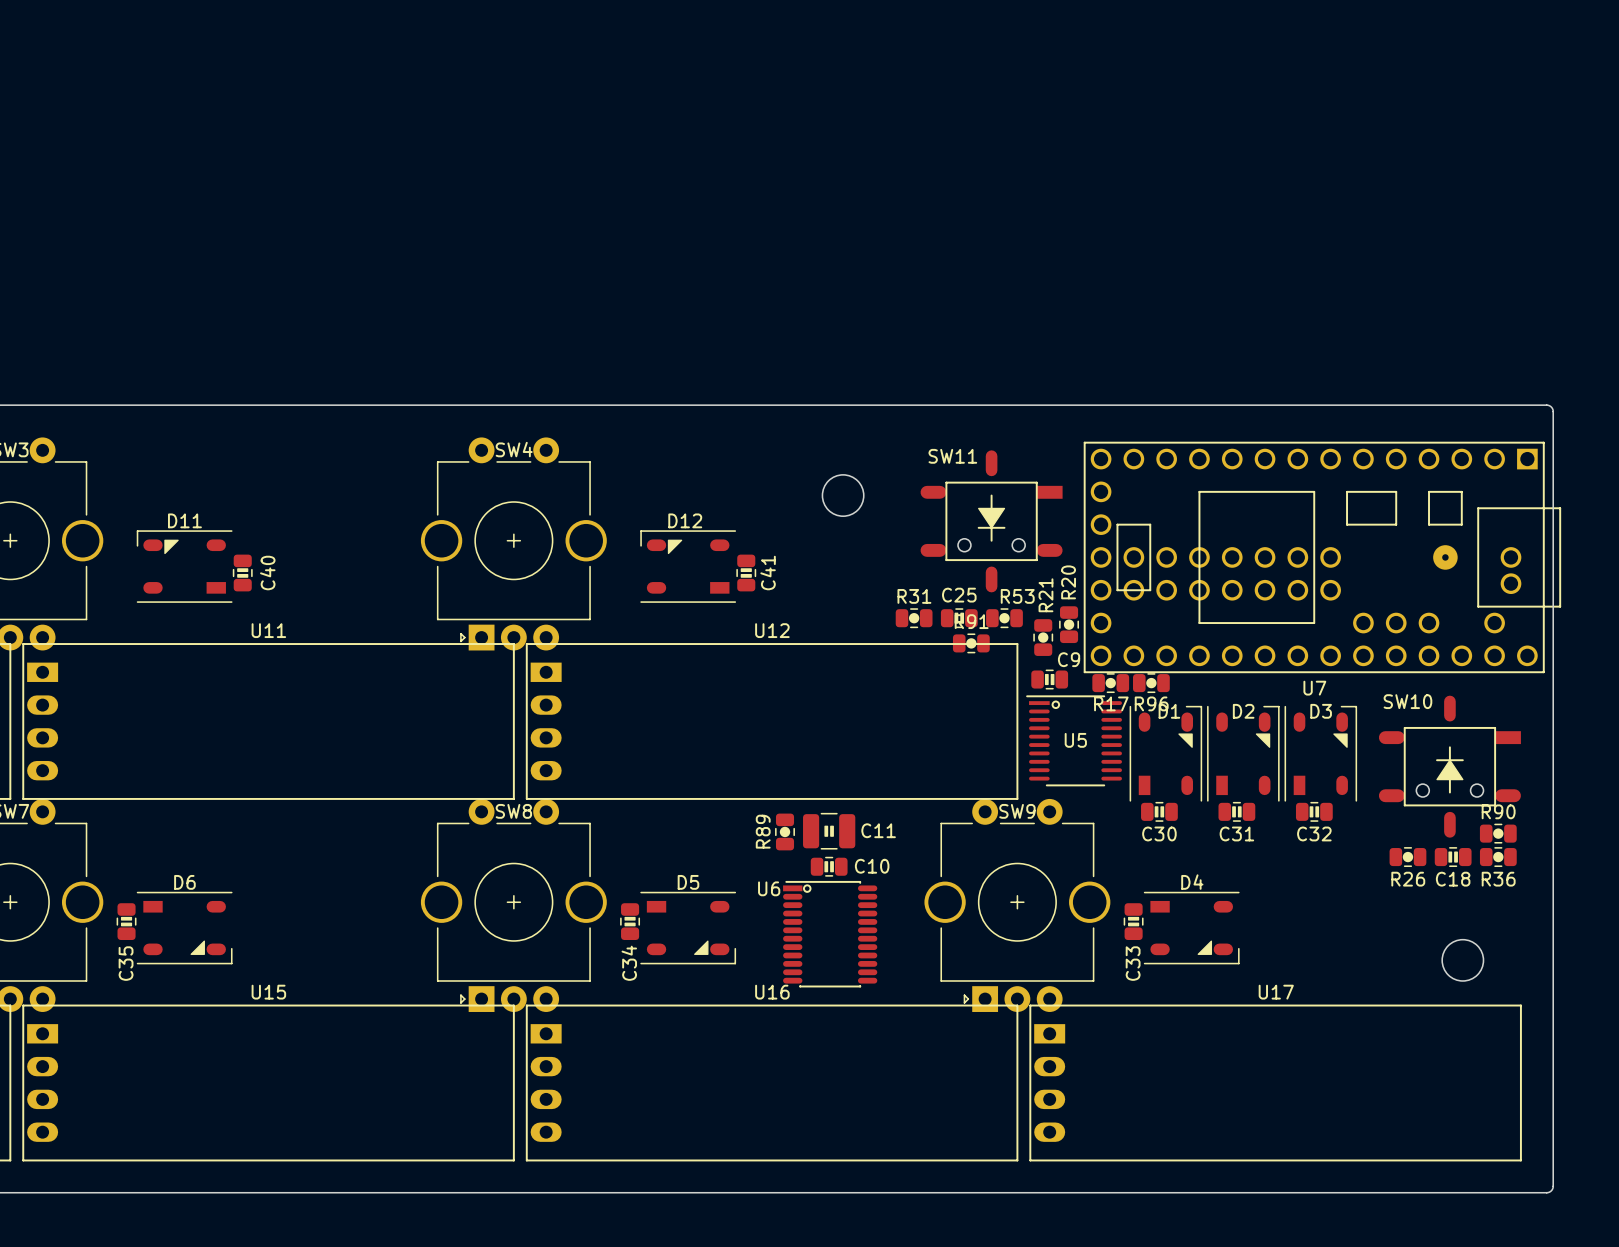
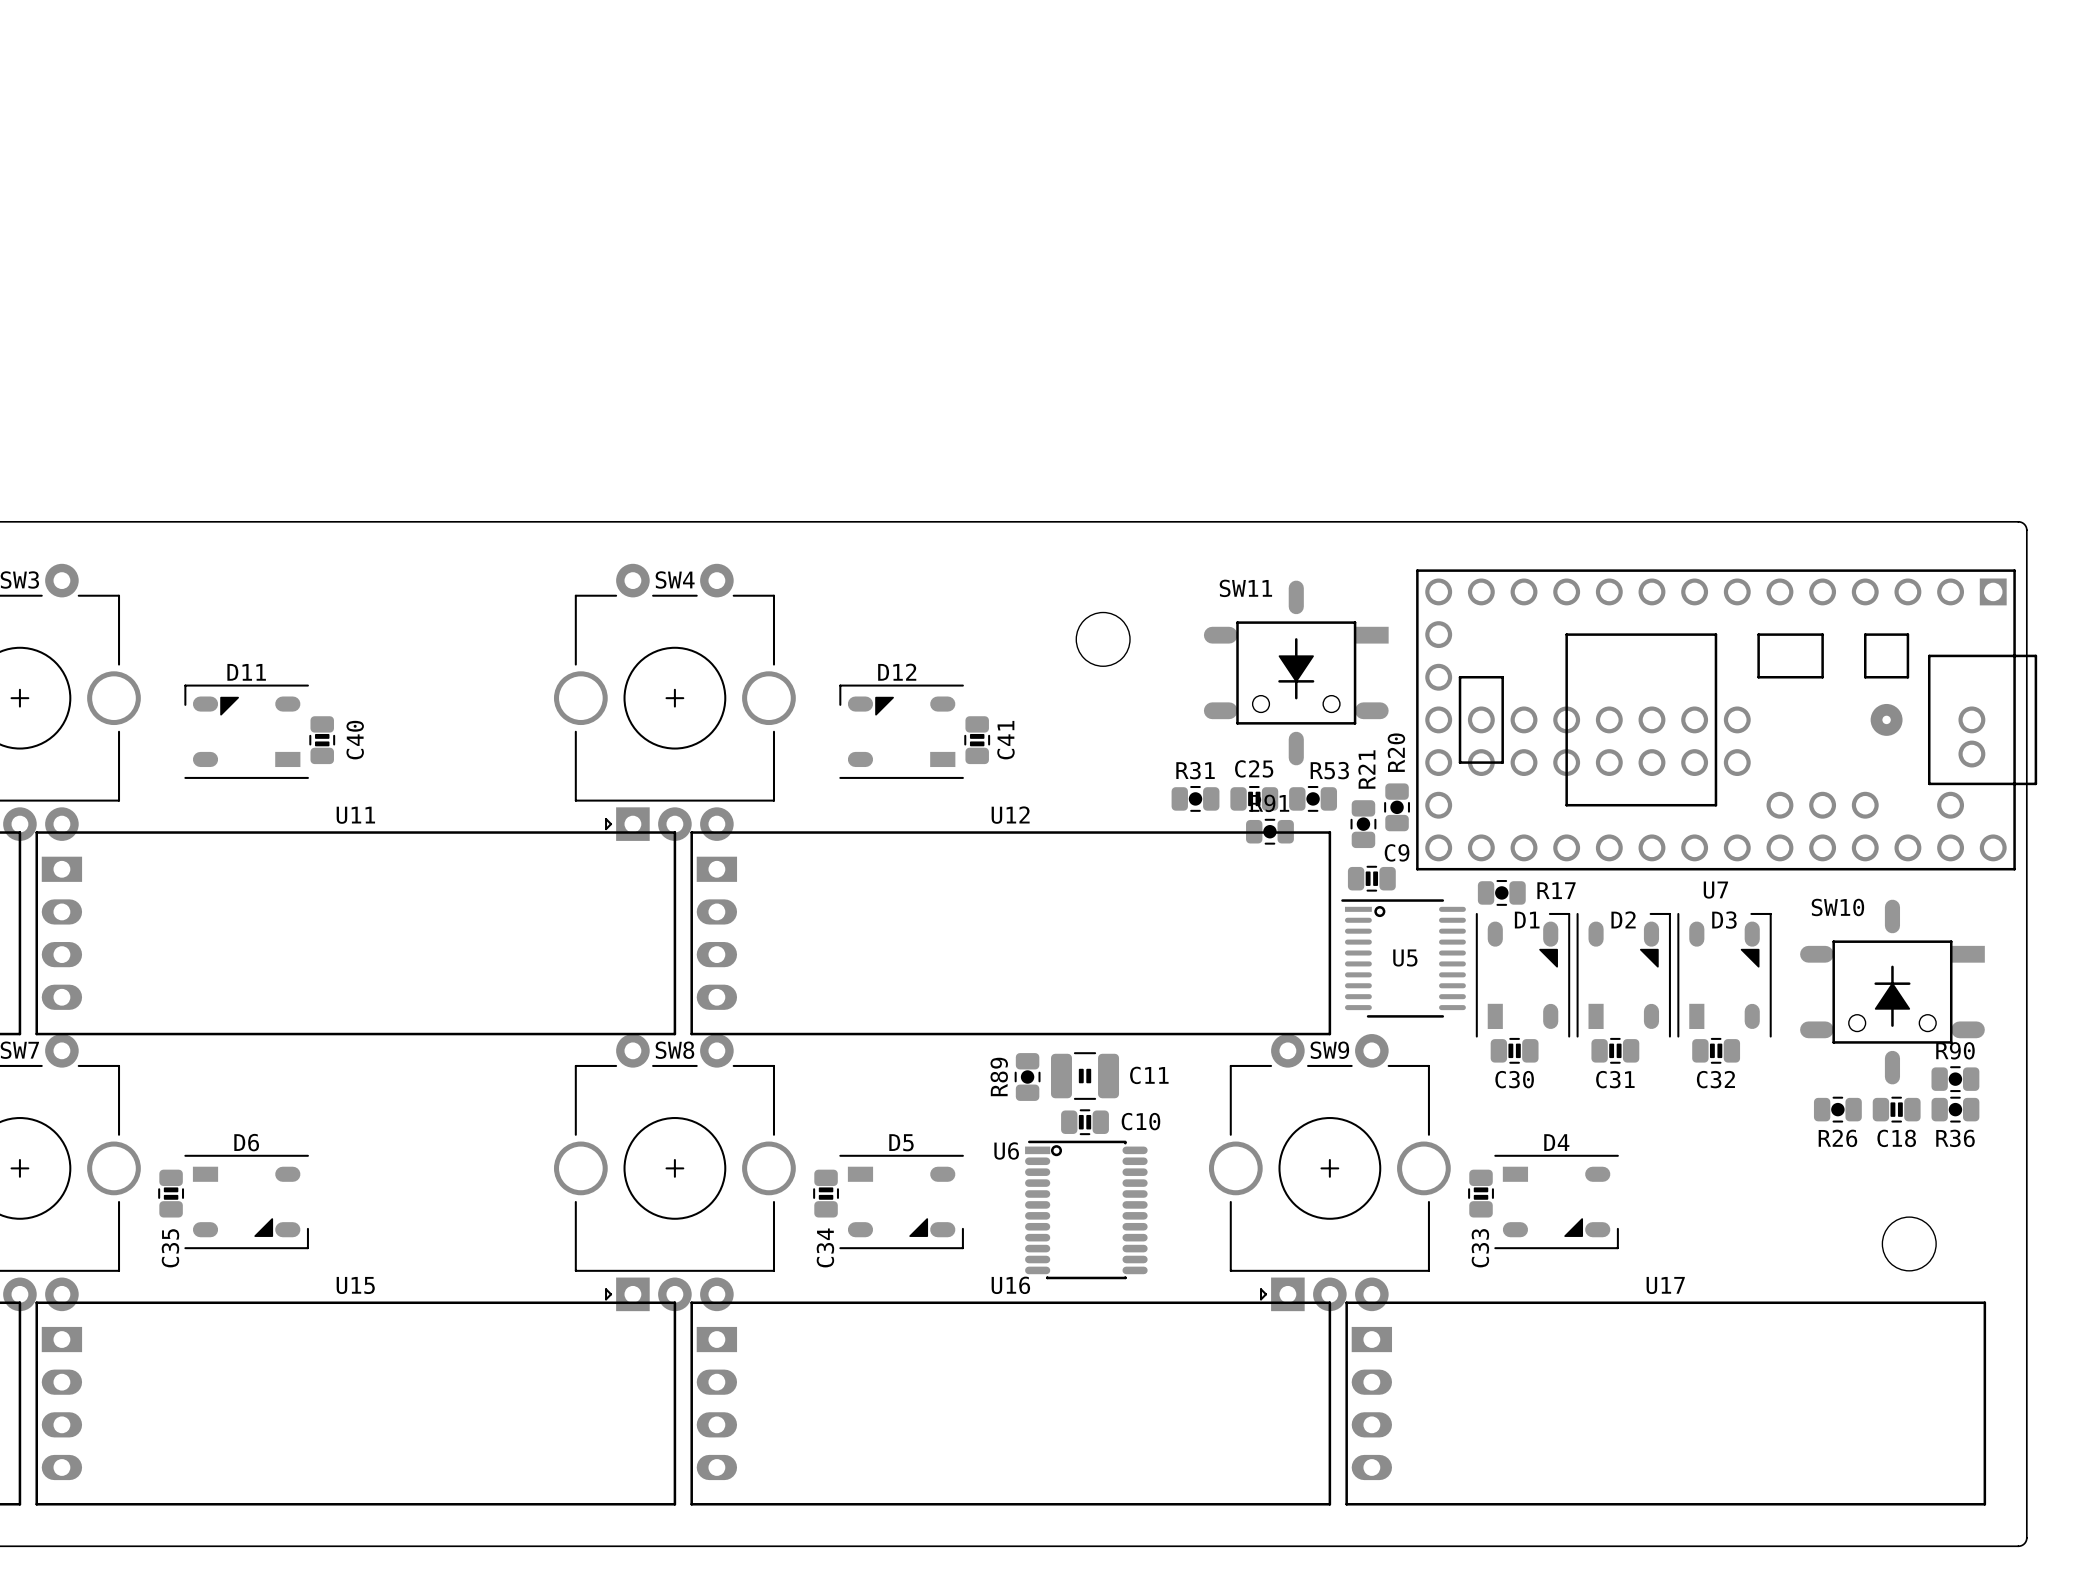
R17 position: (1110, 683) -> (1501, 892)
R96: (1151, 683) -> none
R17 name position: R17 (1111, 703) -> R17 (1556, 890)

